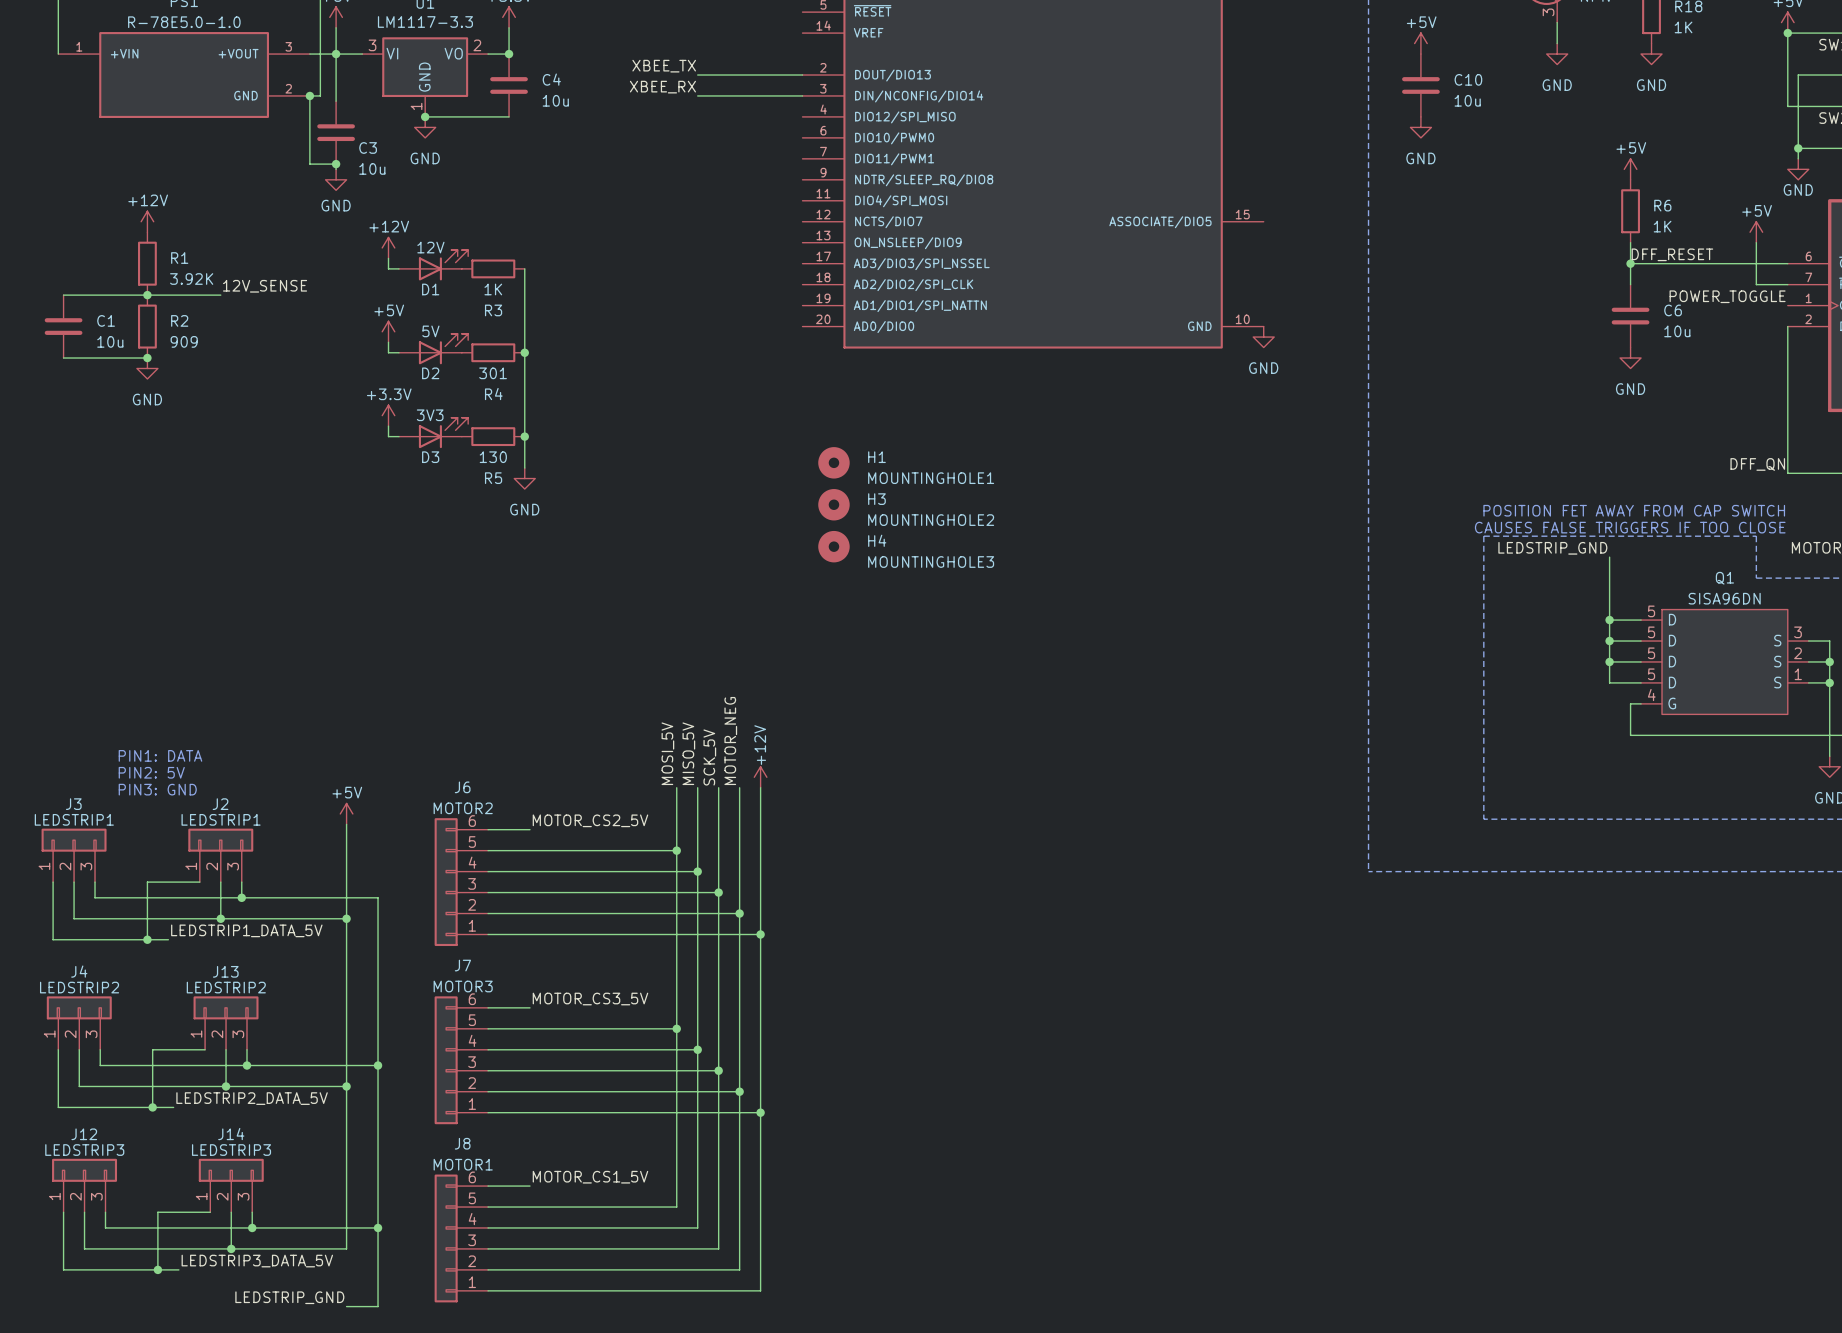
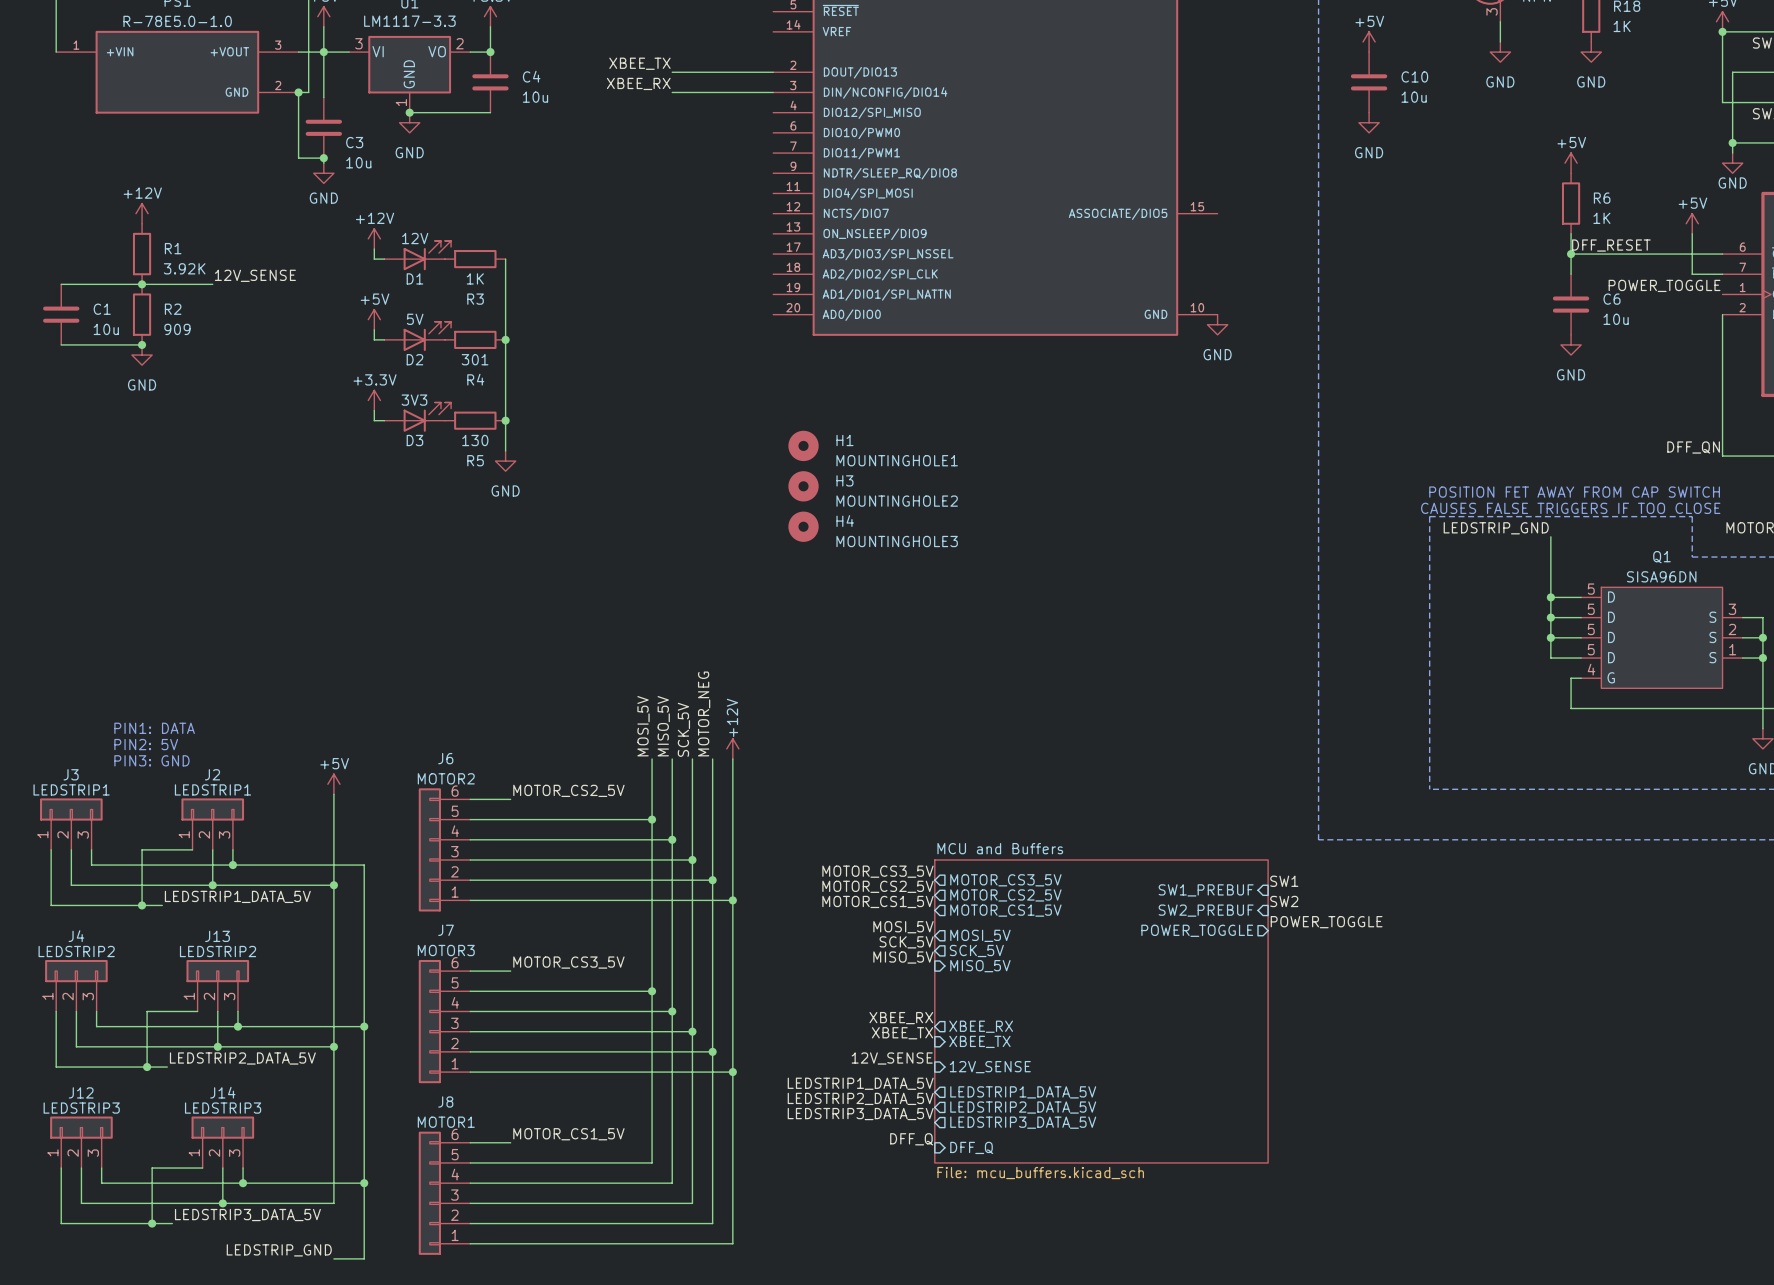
label: none -> MOTOR_CS3_5V (877, 871)
sheet pin: none -> MOTOR_CS3_5V (1005, 880)
label: none -> SW1 (1284, 881)
label: none -> MOTOR_CS2_5V (877, 886)
sheet pin: none -> SW1_PREBUF (1206, 890)
sheet pin: none -> MOTOR_CS2_5V (1005, 895)
label: none -> SW2 (1284, 901)
label: none -> MOTOR_CS1_5V (877, 901)
sheet pin: none -> MOTOR_CS1_5V (1005, 910)
sheet pin: none -> SW2_PREBUF (1206, 910)
label: none -> POWER_TOGGLE (1326, 922)
label: none -> MOSI_5V (903, 927)
sheet pin: none -> POWER_TOGGLE (1197, 930)
sheet pin: none -> MOSI_5V (980, 935)
label: none -> SCK_5V (906, 942)
sheet pin: none -> SCK_5V (976, 950)
label: none -> MISO_5V (903, 957)
sheet pin: none -> MISO_5V (980, 966)
sheet MCU and Buffers: none -> File: mcu_buffers.kicad_sch (1101, 1011)
label: none -> XBEE_RX (901, 1018)
sheet pin: none -> XBEE_RX (981, 1026)
label: none -> XBEE_TX (902, 1033)
sheet pin: none -> XBEE_TX (979, 1041)
label: none -> 12V_SENSE (892, 1058)
sheet pin: none -> 12V_SENSE (990, 1067)
label: none -> LEDSTRIP1_DATA_5V (860, 1083)
sheet pin: none -> LEDSTRIP1_DATA_5V (1023, 1092)
label: none -> LEDSTRIP2_DATA_5V (860, 1098)
sheet pin: none -> LEDSTRIP2_DATA_5V (1023, 1107)
label: none -> LEDSTRIP3_DATA_5V (860, 1114)
sheet pin: none -> LEDSTRIP3_DATA_5V (1023, 1122)
label: none -> DFF_Q (911, 1139)
sheet pin: none -> DFF_Q (971, 1147)

